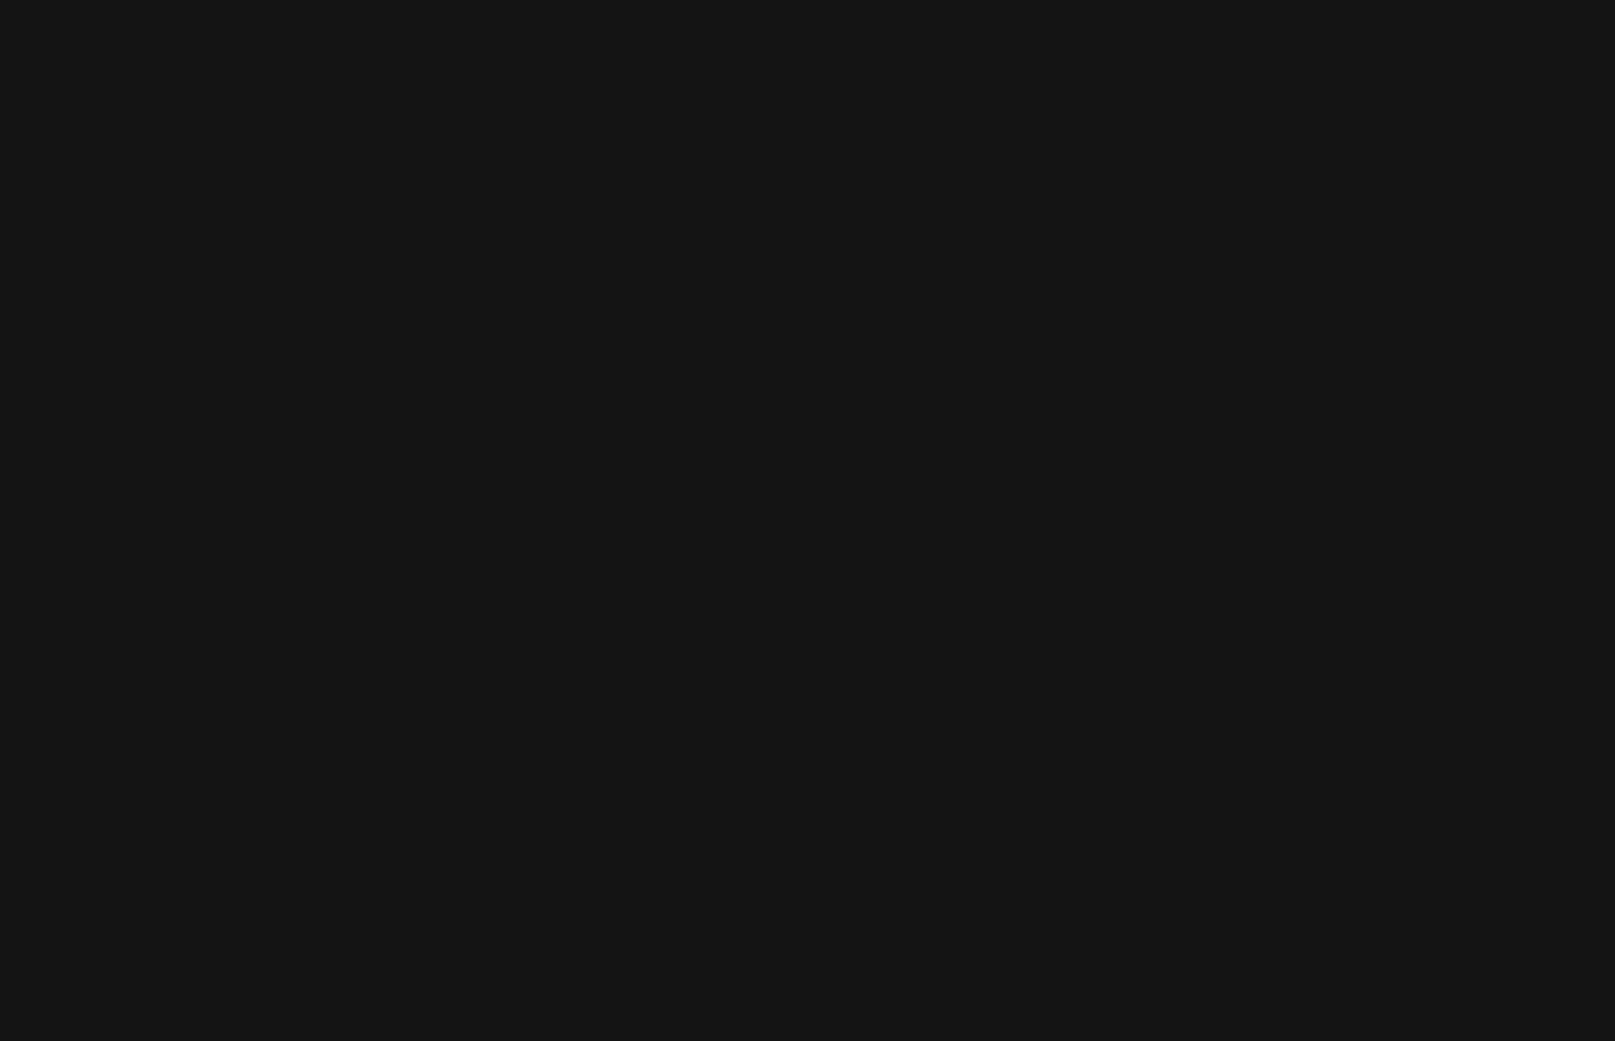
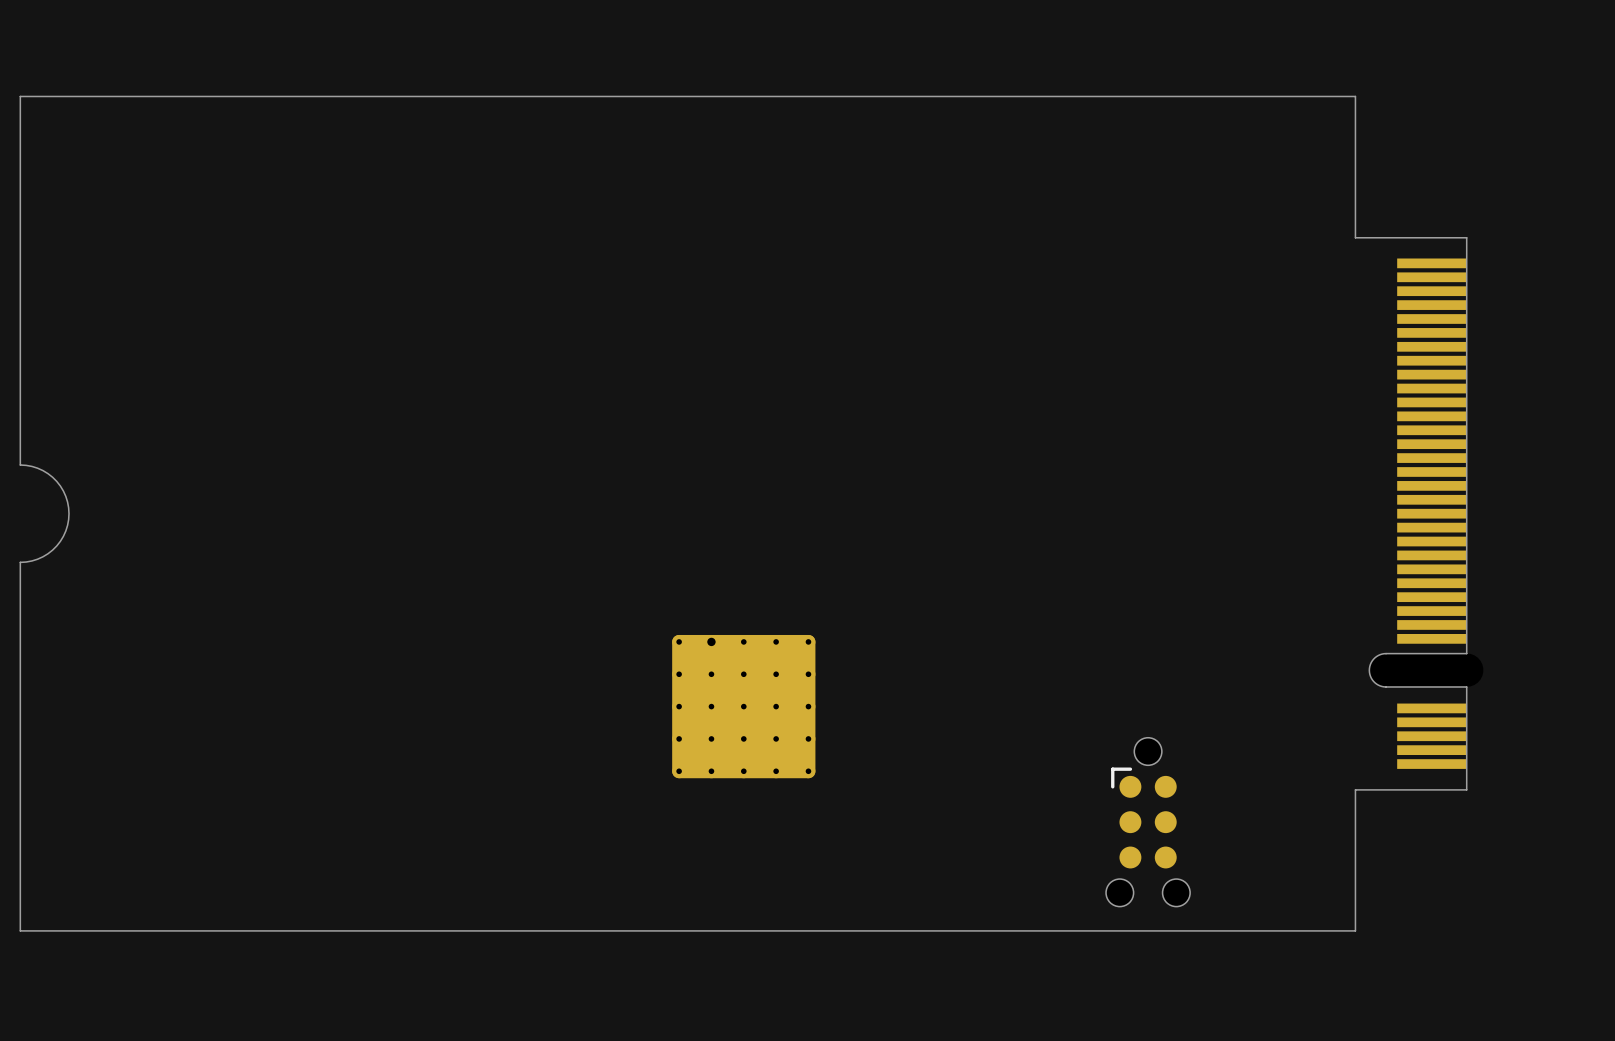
board edge: none -> (1355, 96) (1355, 237) (1466, 237) (1466, 653) (1384, 653) (1373, 659) (1369, 670) (1373, 681) (1384, 686) (1466, 686) (1466, 789) (1355, 789) (1355, 930) (20, 930) (20, 562) (37, 559) (52, 550) (65, 530) (69, 513) (65, 496) (56, 481) (42, 470) (20, 465) (20, 96) (1355, 96)
part: none -> (1426, 513)
part: none -> (743, 706)
part: none -> (1148, 822)

